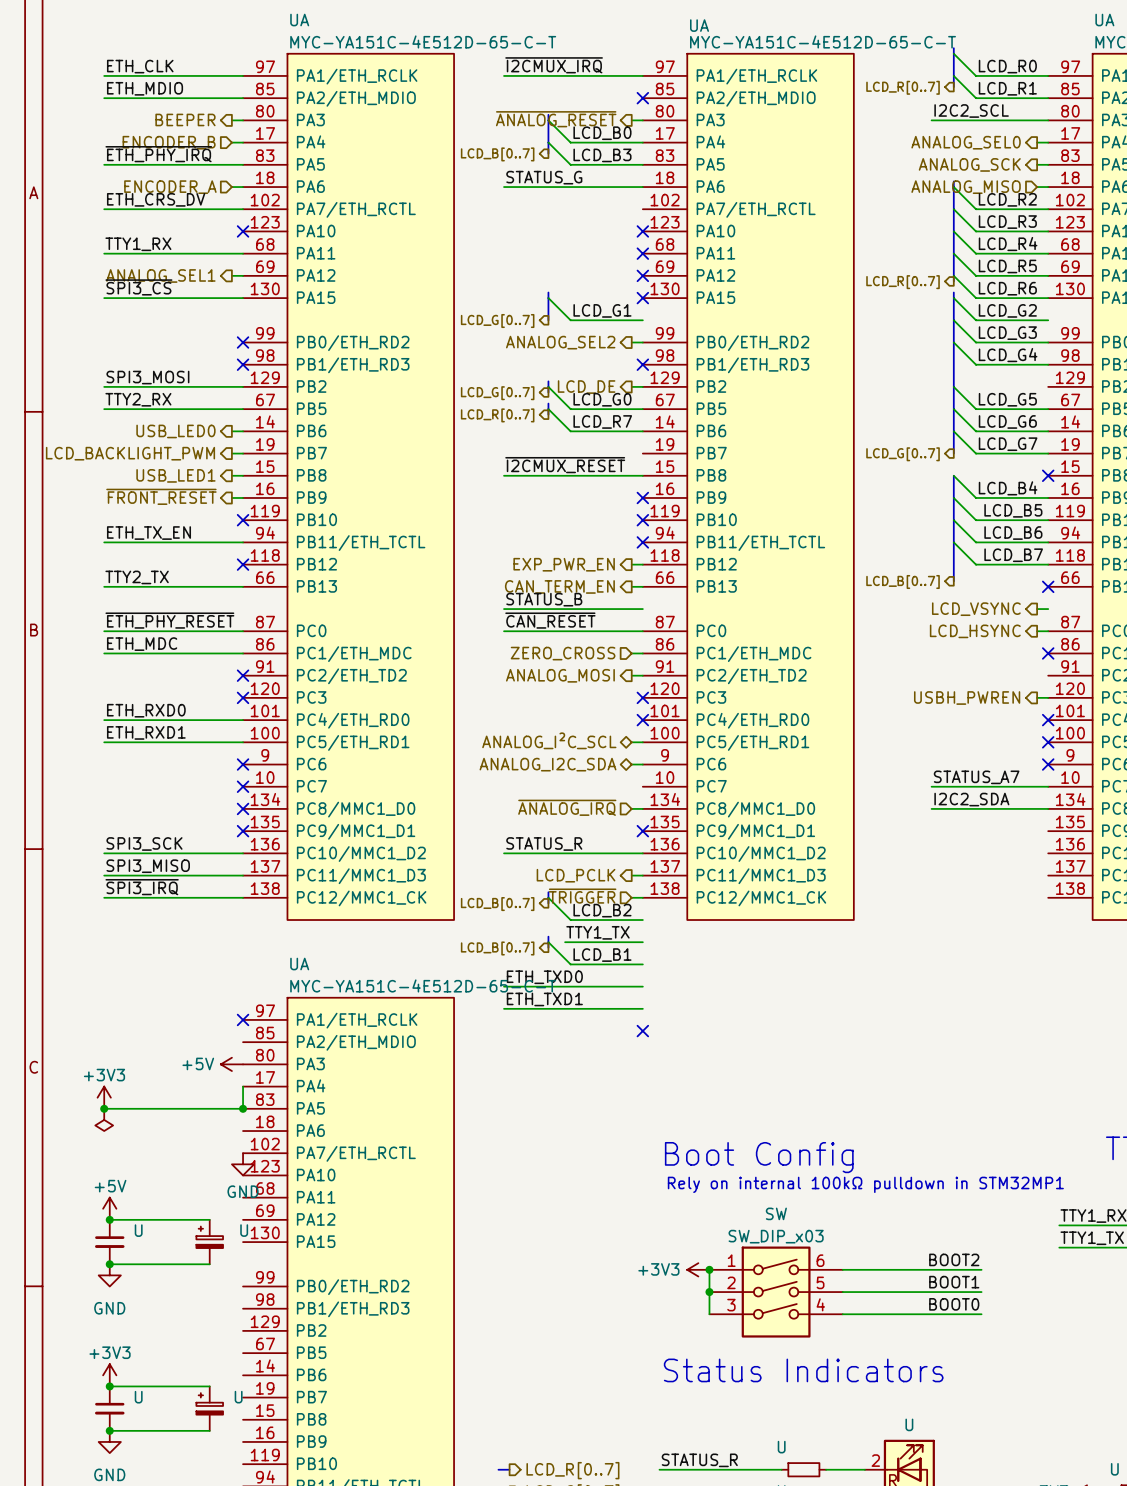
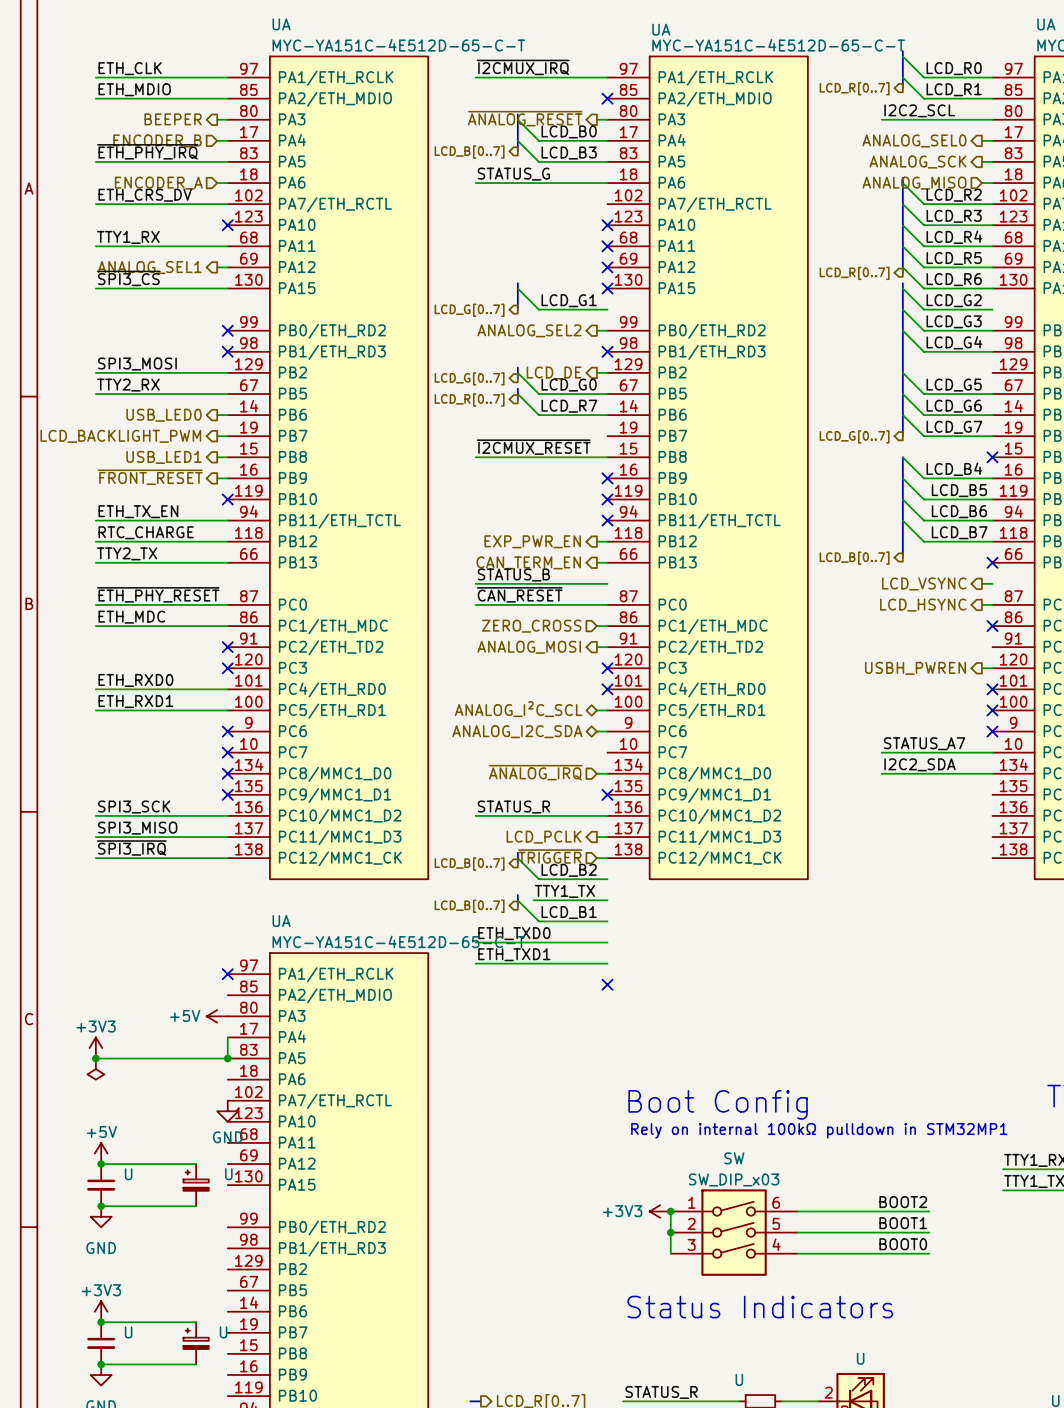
label: none -> RTC_CHARGE (146, 532)
wire: none -> (95, 541) (227, 541)
no-connect mark: (243, 564) -> none

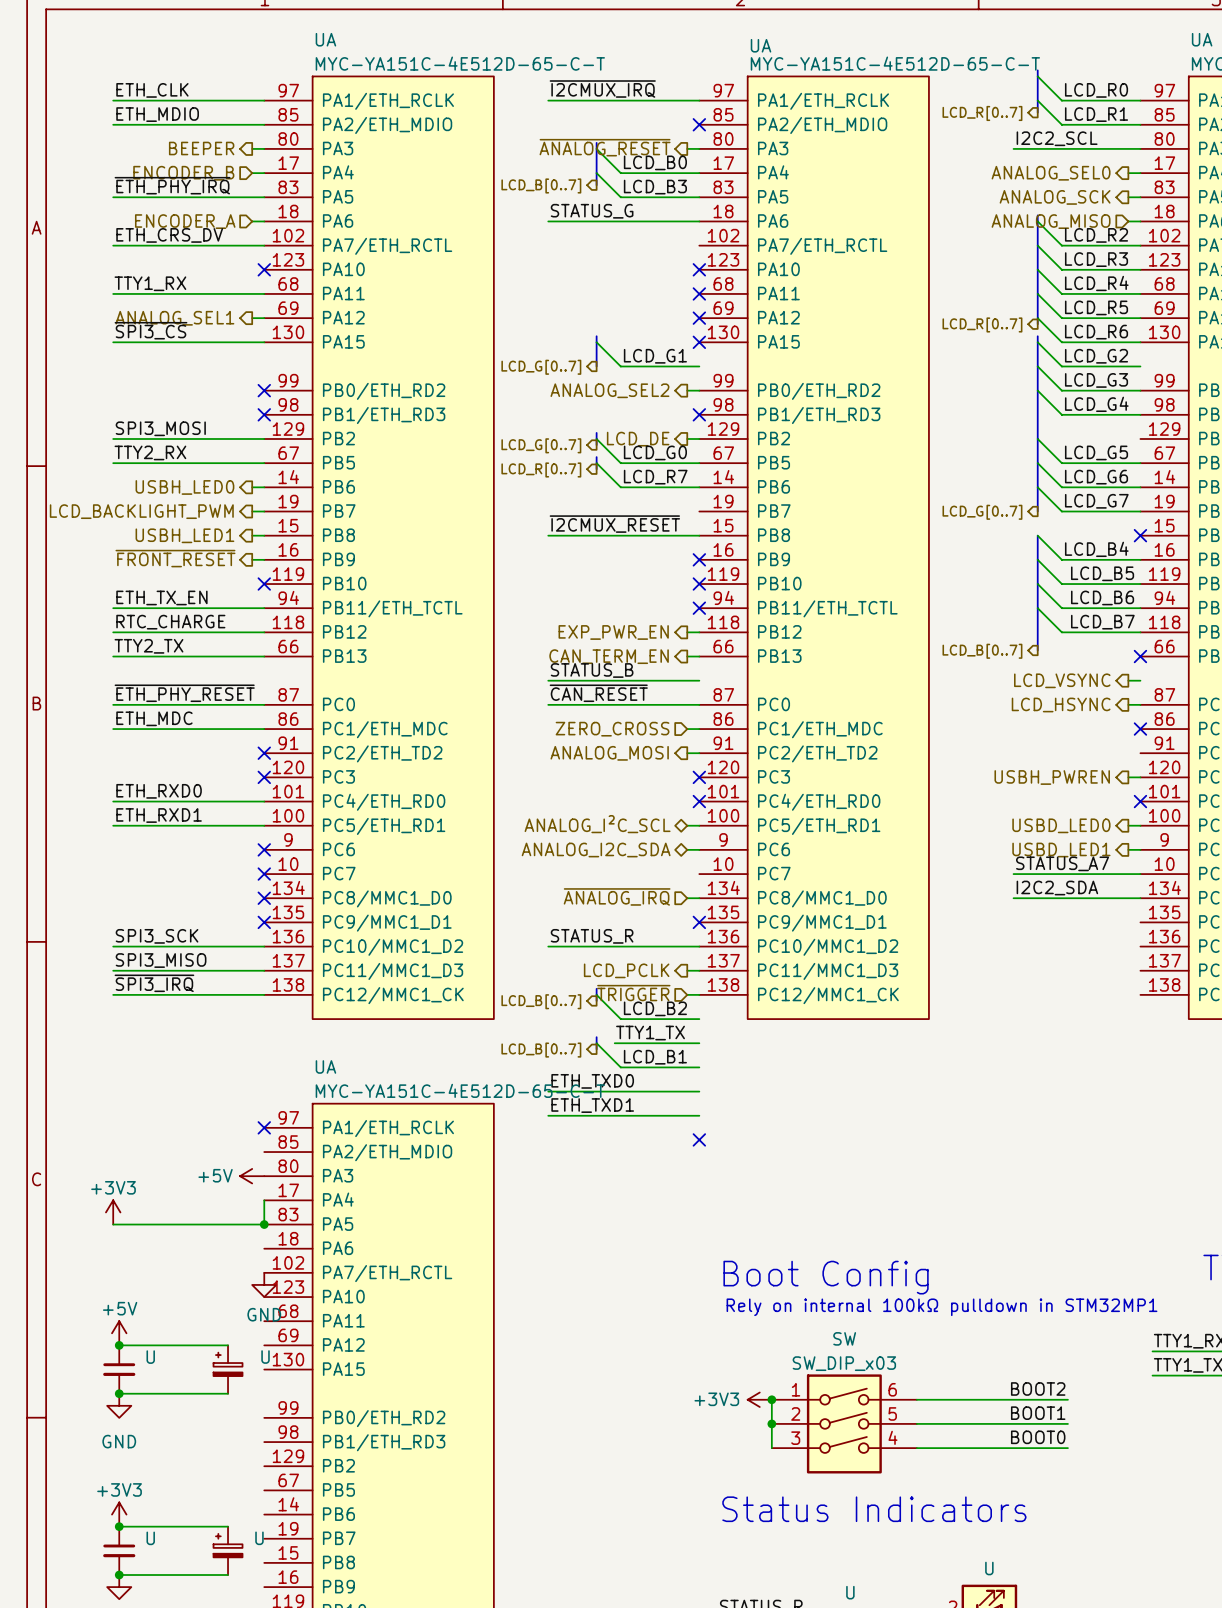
hierarchical label: USB_LED0 (164, 415) -> USBH_LED0 (184, 487)
hierarchical label: USB_LED1 (164, 457) -> USBH_LED1 (184, 535)
hierarchical label: none -> USBD_LED0 (1061, 825)
wire: none -> (1128, 825) (1140, 825)
no-connect mark: (992, 710) -> none
hierarchical label: none -> USBD_LED1 (1061, 850)
wire: none -> (1128, 849) (1140, 849)
no-connect mark: (992, 731) -> none
junction: (95, 1058) -> none
power symbol: (95, 1069) -> none

